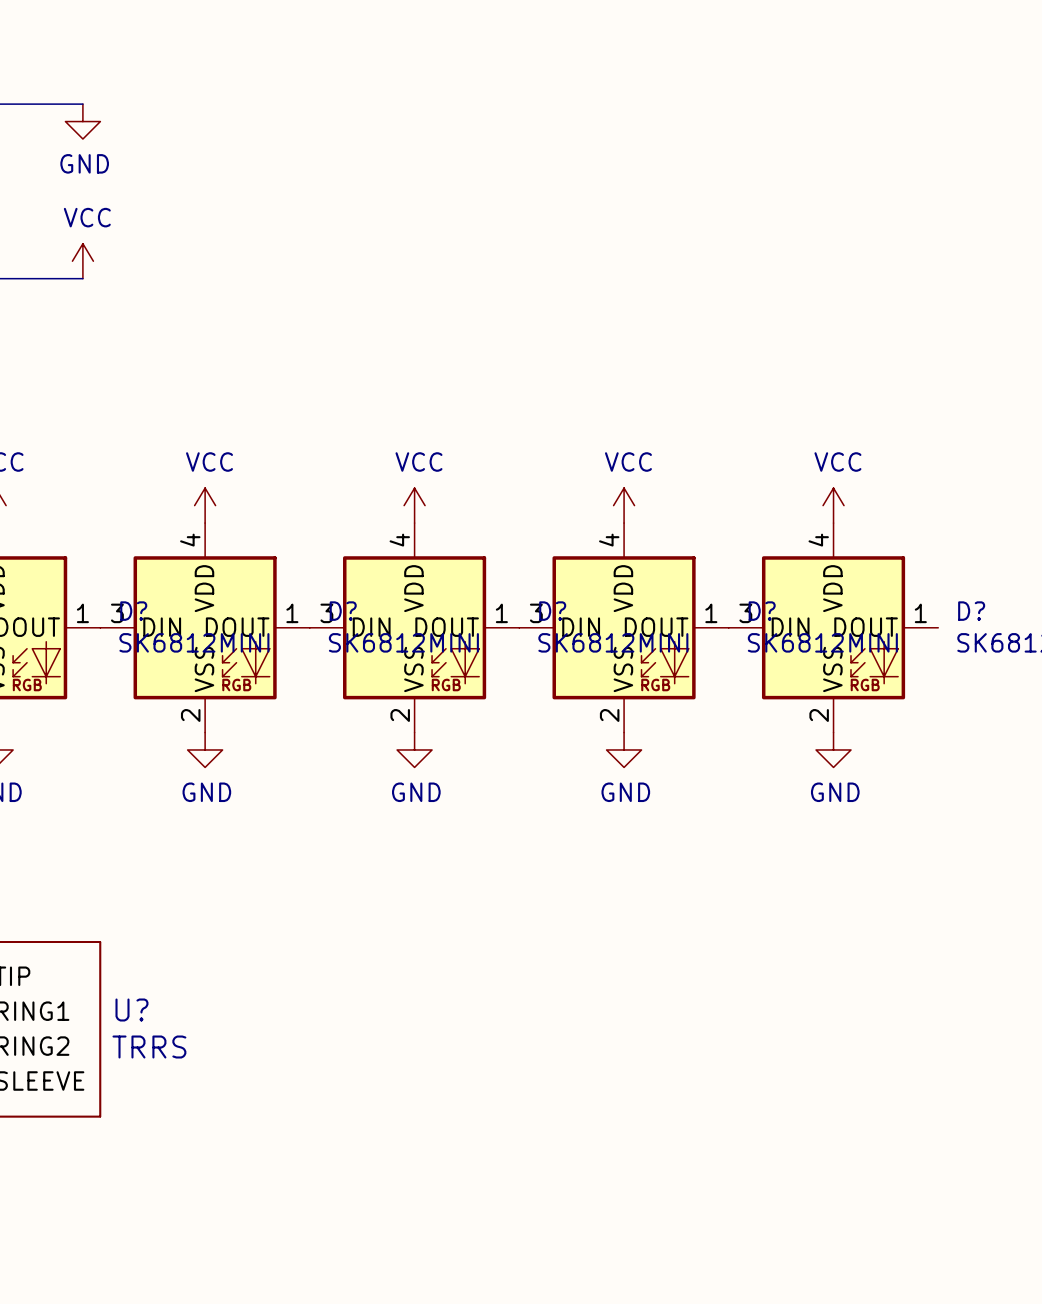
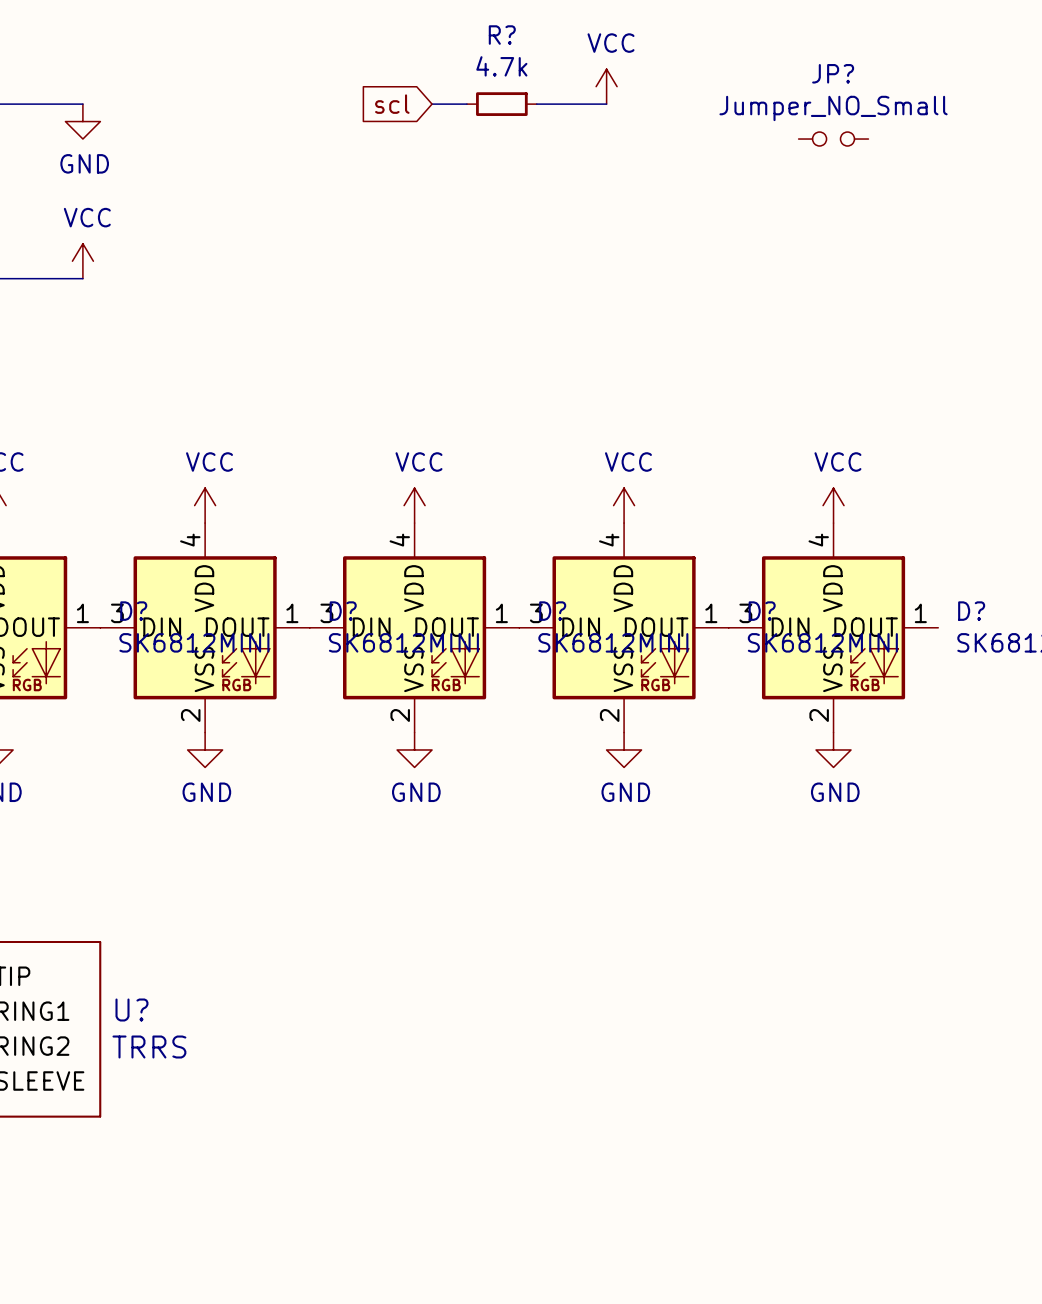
power symbol: none -> VCC (606, 86)
global label: none -> scl (392, 104)
wire: none -> (432, 104) (466, 104)
R?: none -> 4.7k (501, 104)
wire: none -> (536, 104) (606, 104)
JP?: none -> Jumper_NO_Small (833, 139)

